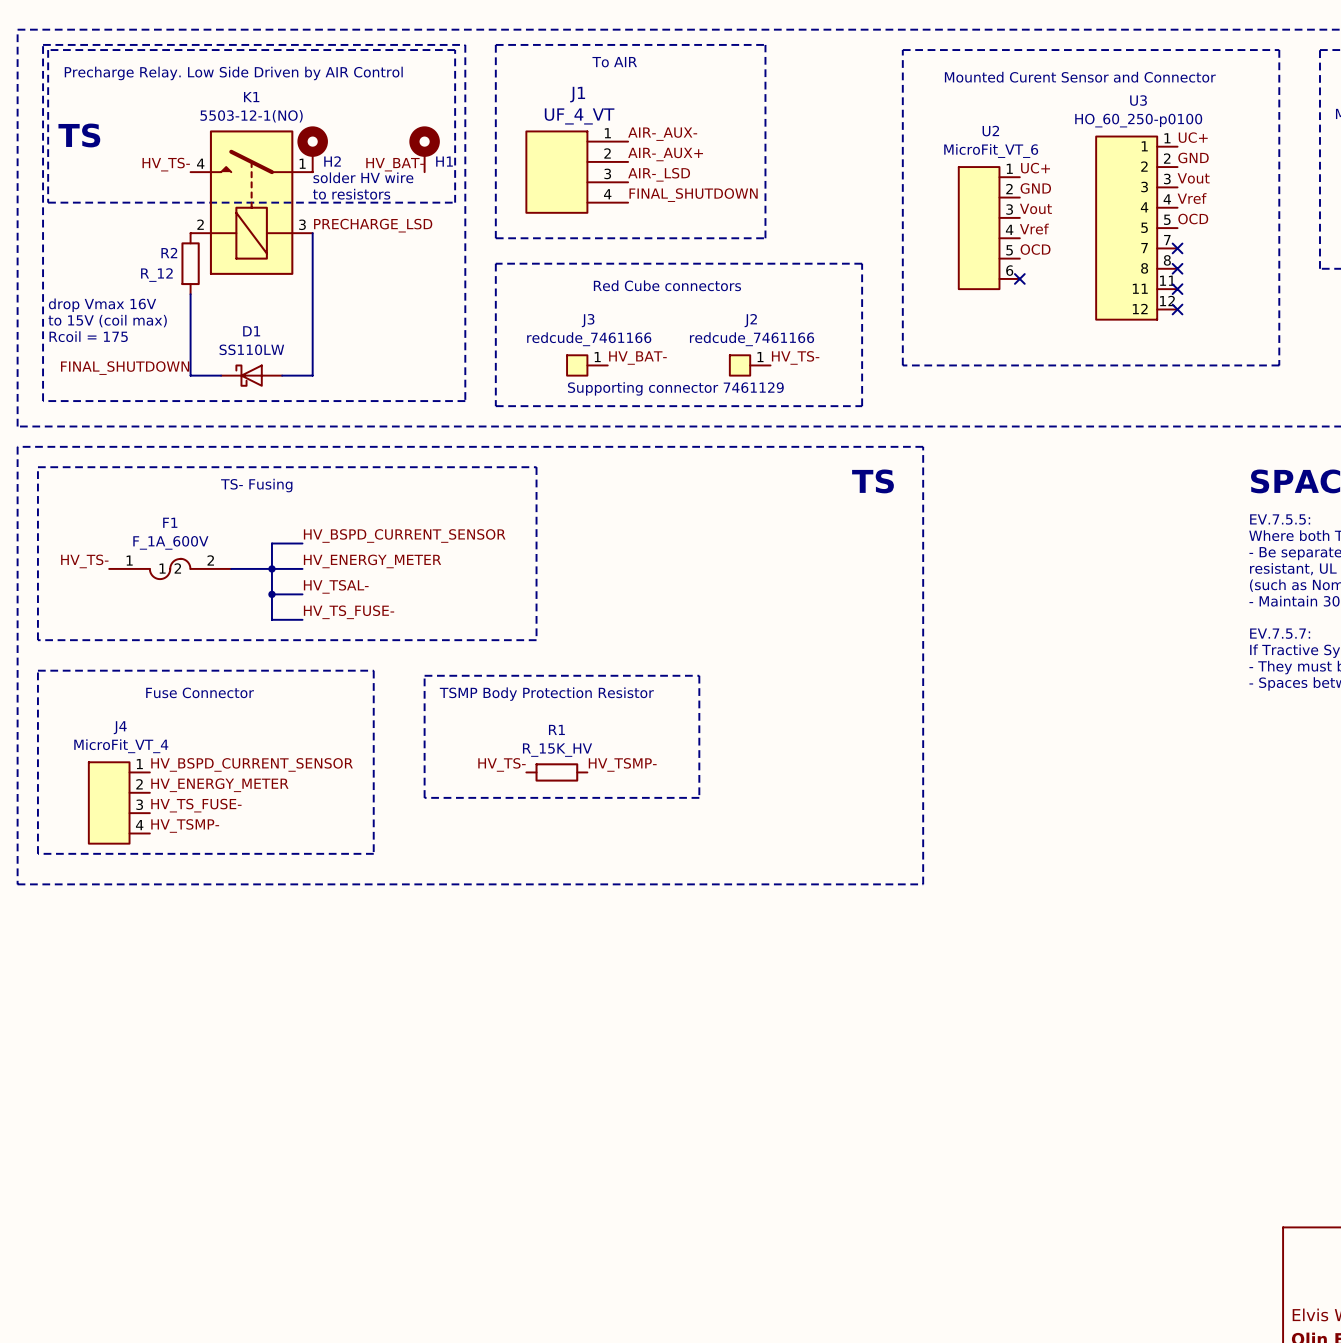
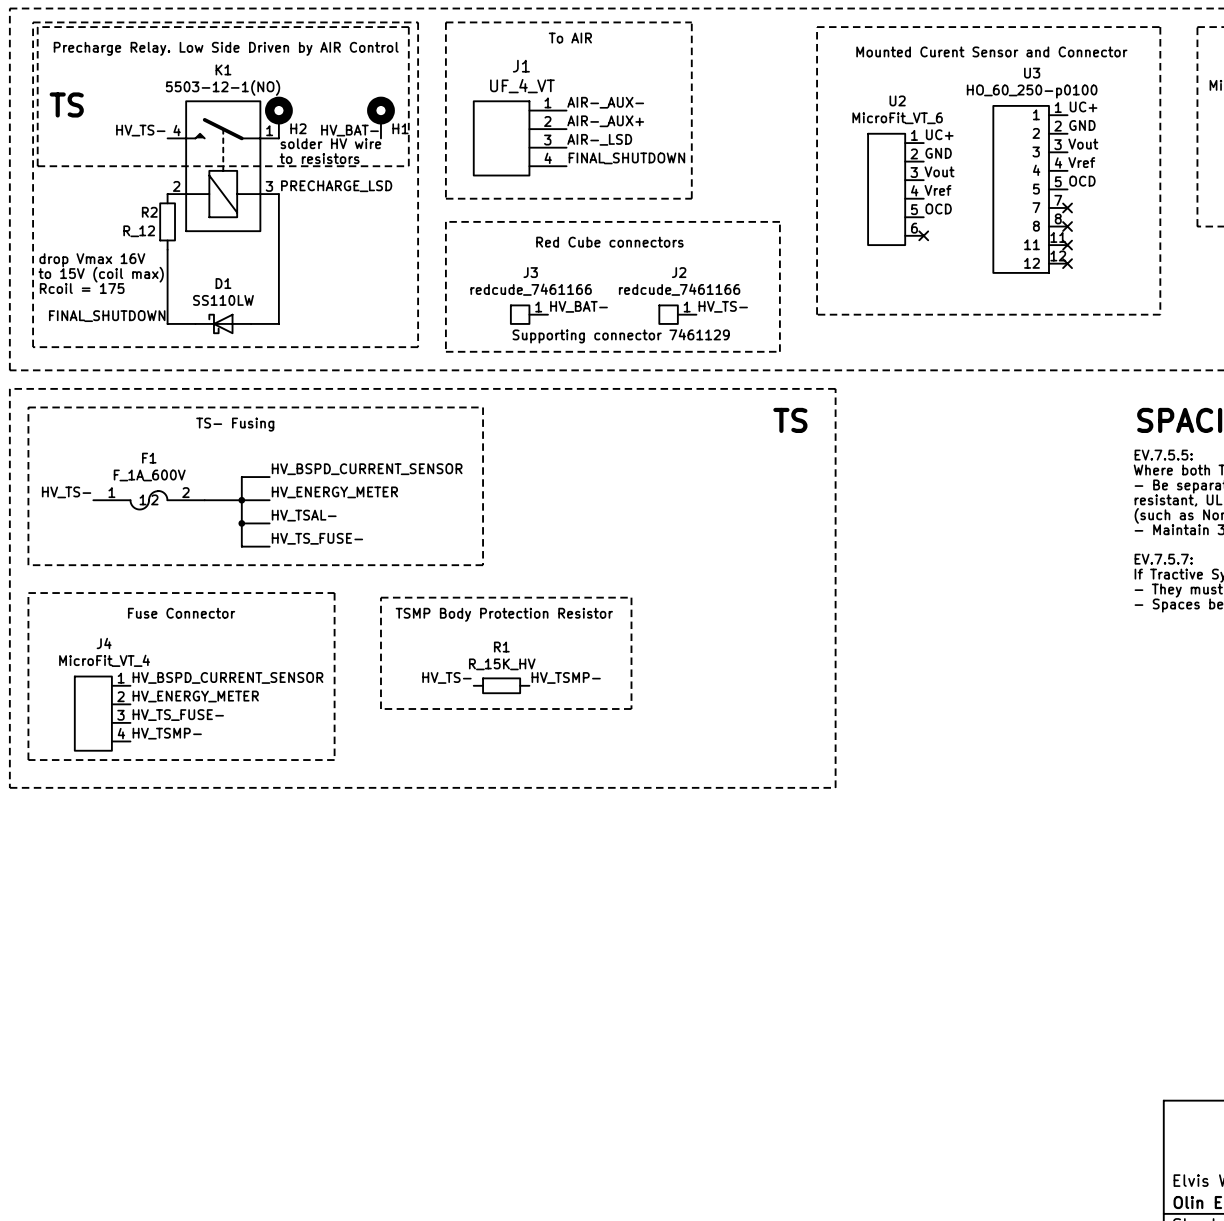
text position: To AIR (614, 62) -> To AIR (570, 38)

